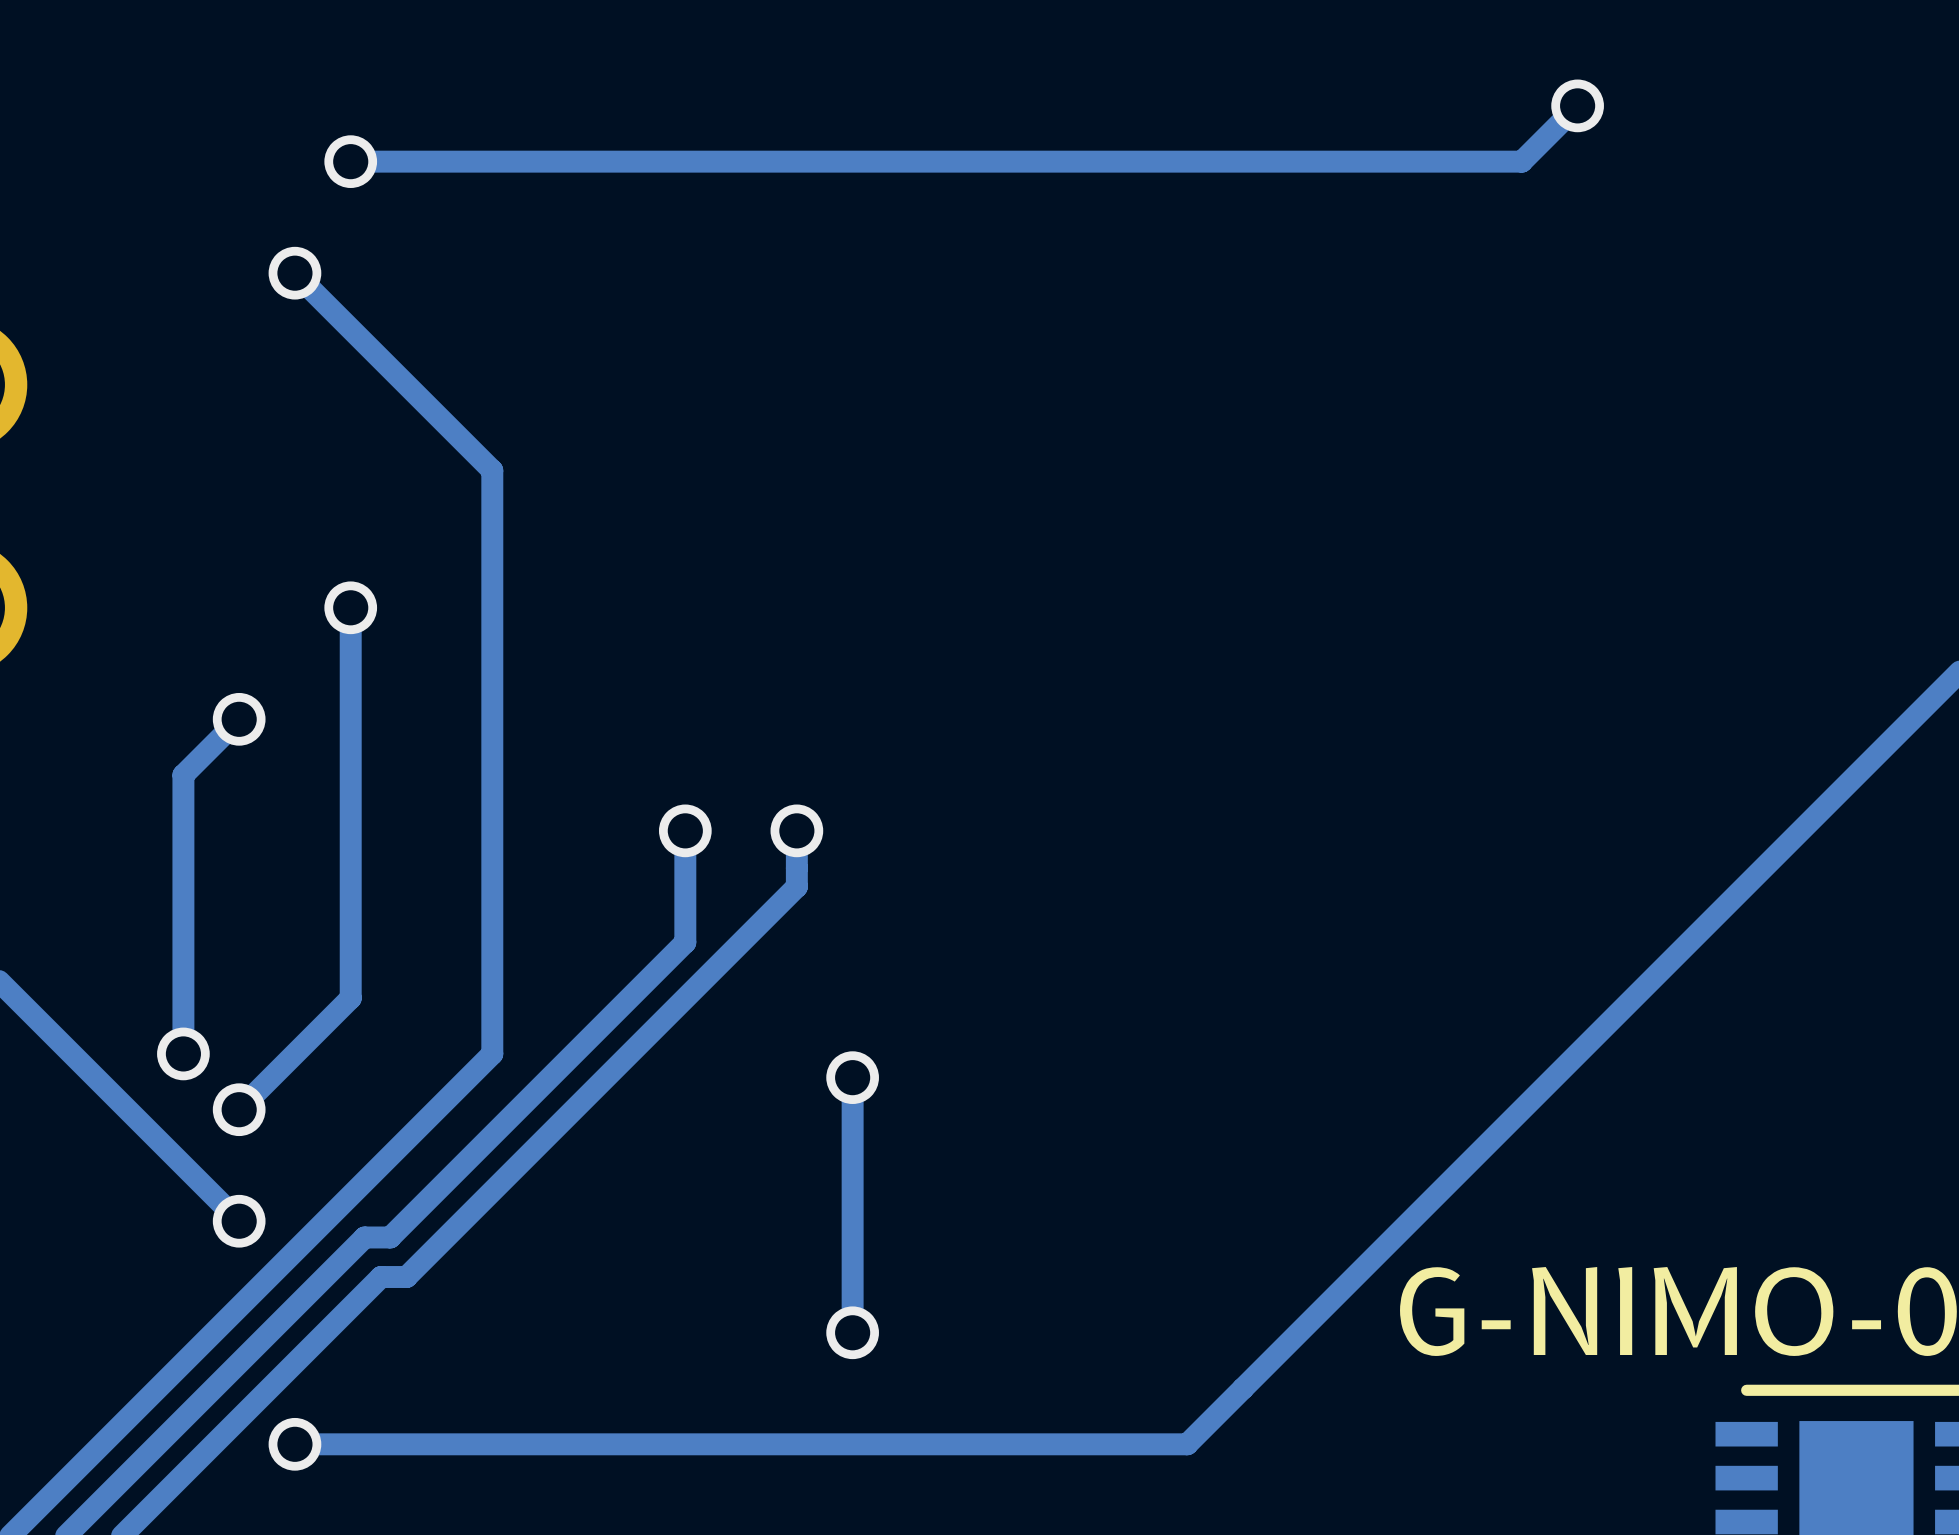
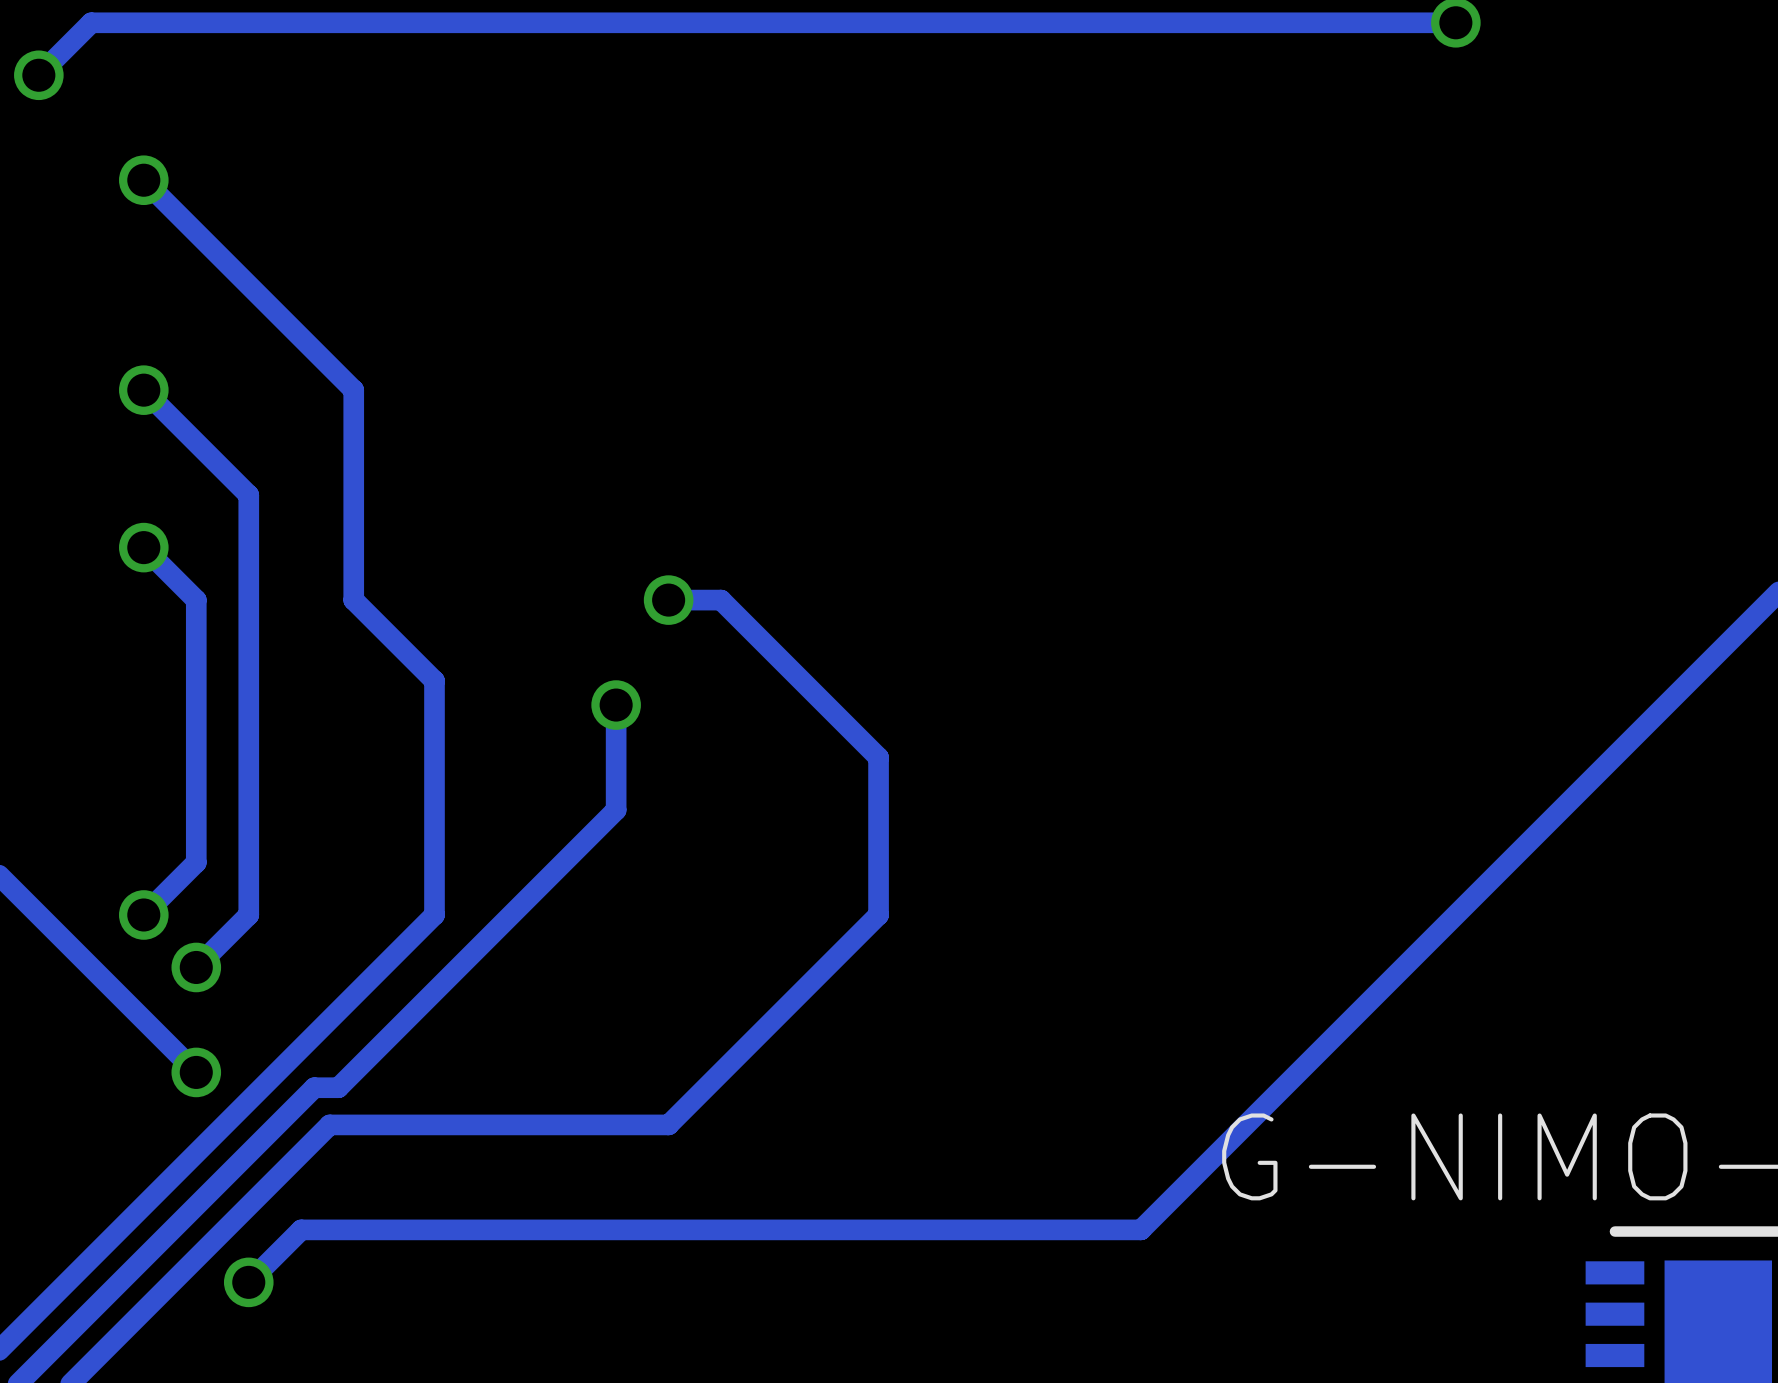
track: (1577, 105) (1521, 161) (350, 161) -> (1455, 22) (91, 22) (38, 75)
via: none -> (38, 75)
via: (350, 161) -> none
via: none -> (143, 180)
track: (294, 273) (492, 470) (492, 805) -> (143, 180) (353, 390) (353, 600) (434, 680)
via: (294, 273) -> none
via: none -> (143, 390)
track: (350, 607) (350, 998) (294, 1053) -> (143, 390) (248, 495) (248, 914)
via: (350, 607) -> none
track: (239, 719) (183, 775) (183, 1053) -> (143, 547) (196, 600) (196, 862) (143, 914)
via position: (239, 719) -> (143, 547)
track: (796, 830) (796, 886) (406, 1277) -> (668, 600) (721, 600) (878, 757) (878, 914) (668, 1124) (353, 1124)
via position: (796, 830) -> (668, 600)
track: (852, 1077) (852, 1332) -> none
via: (852, 1077) -> none
via: (852, 1332) -> none
track: (1243, 1388) (1187, 1444) (294, 1444) -> (1140, 1229) (301, 1229) (248, 1282)

